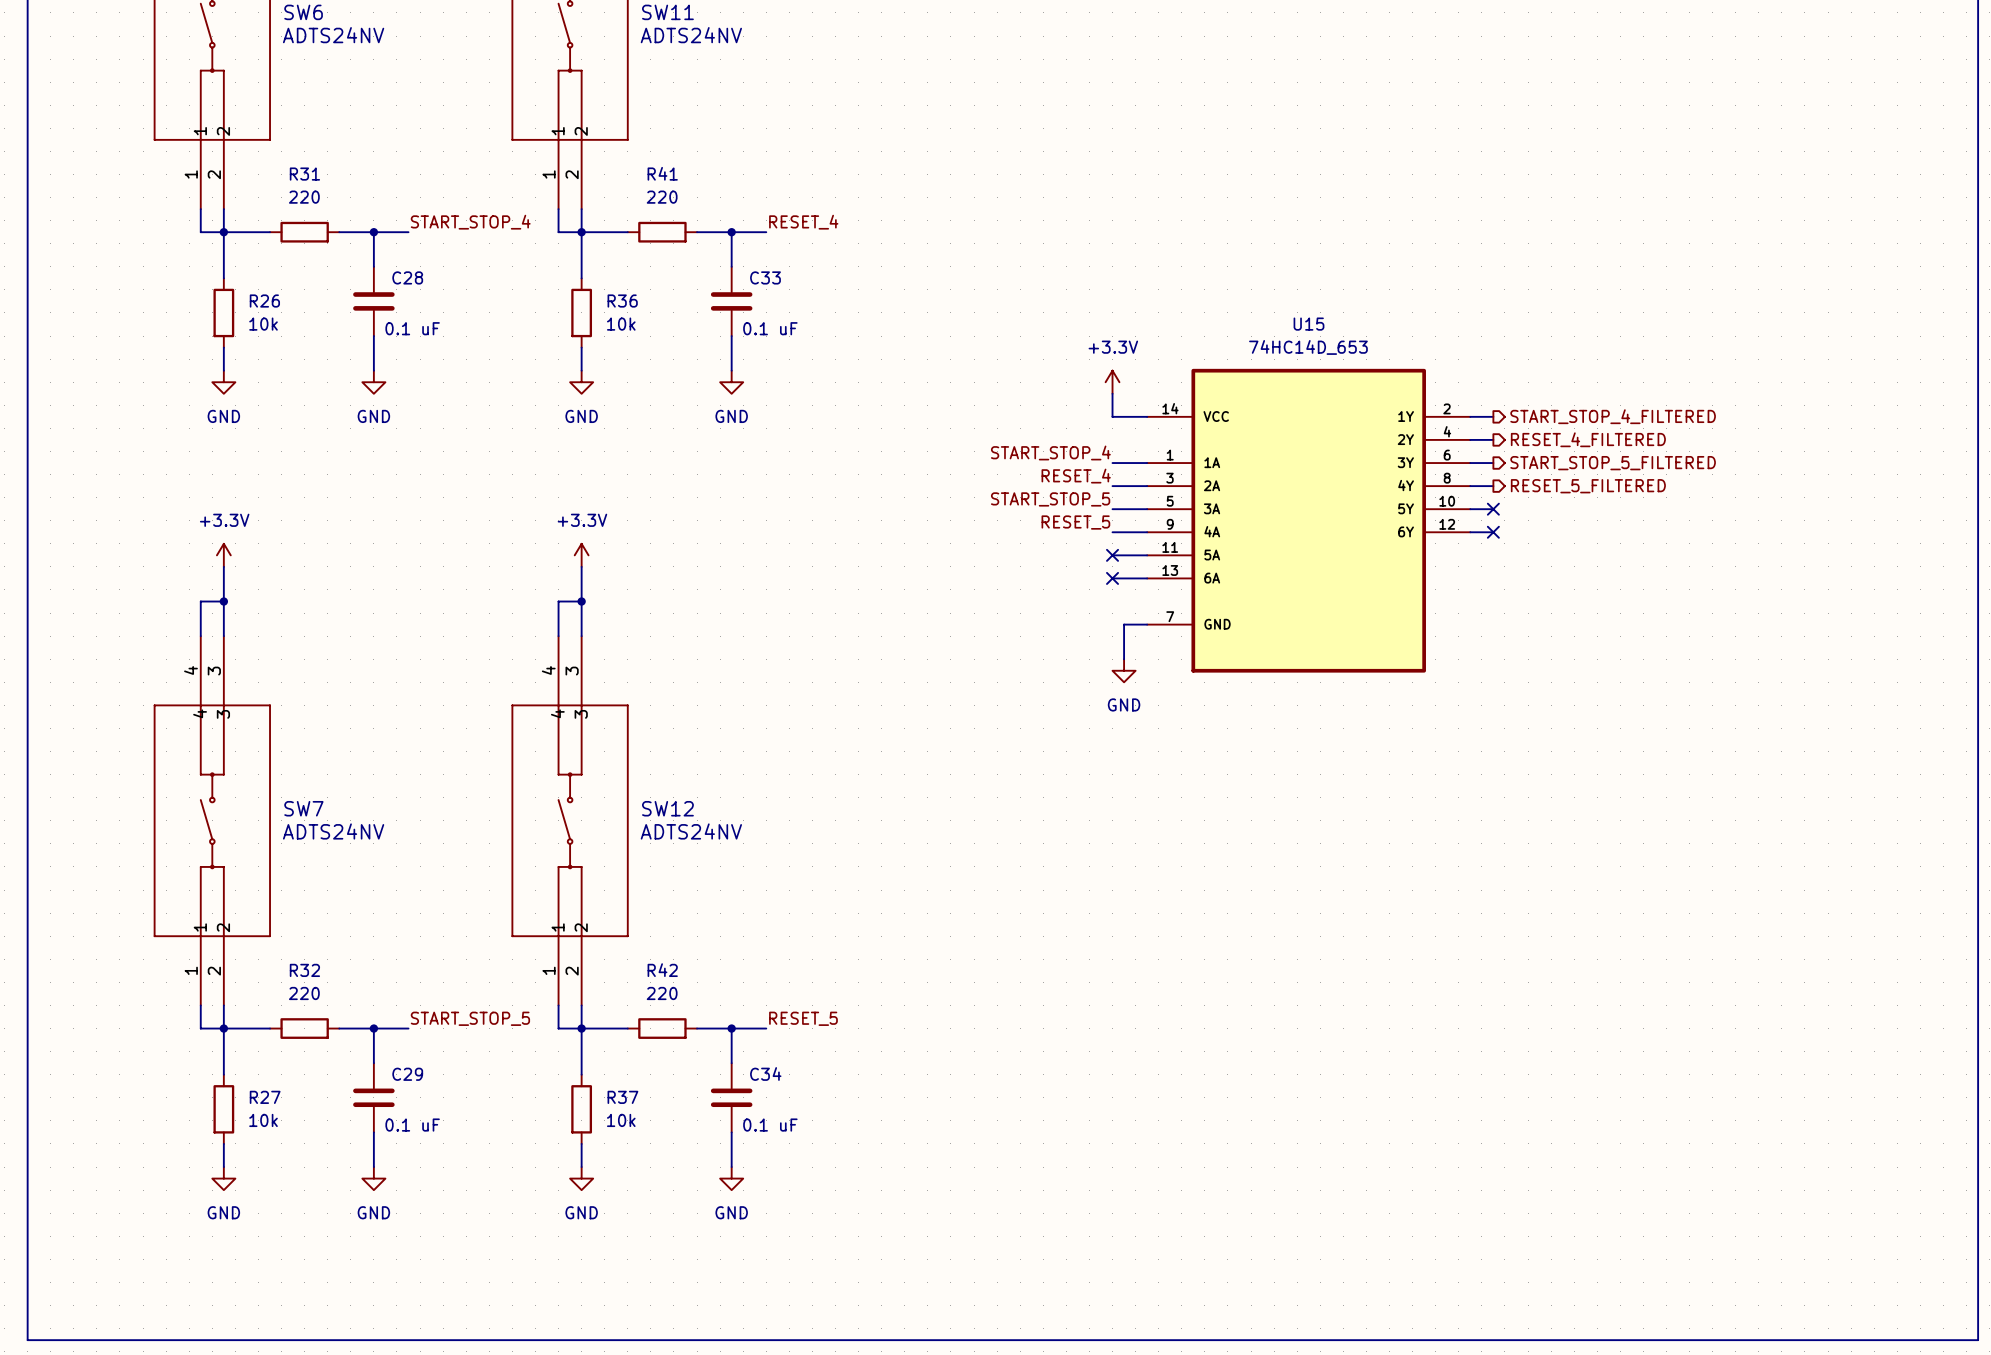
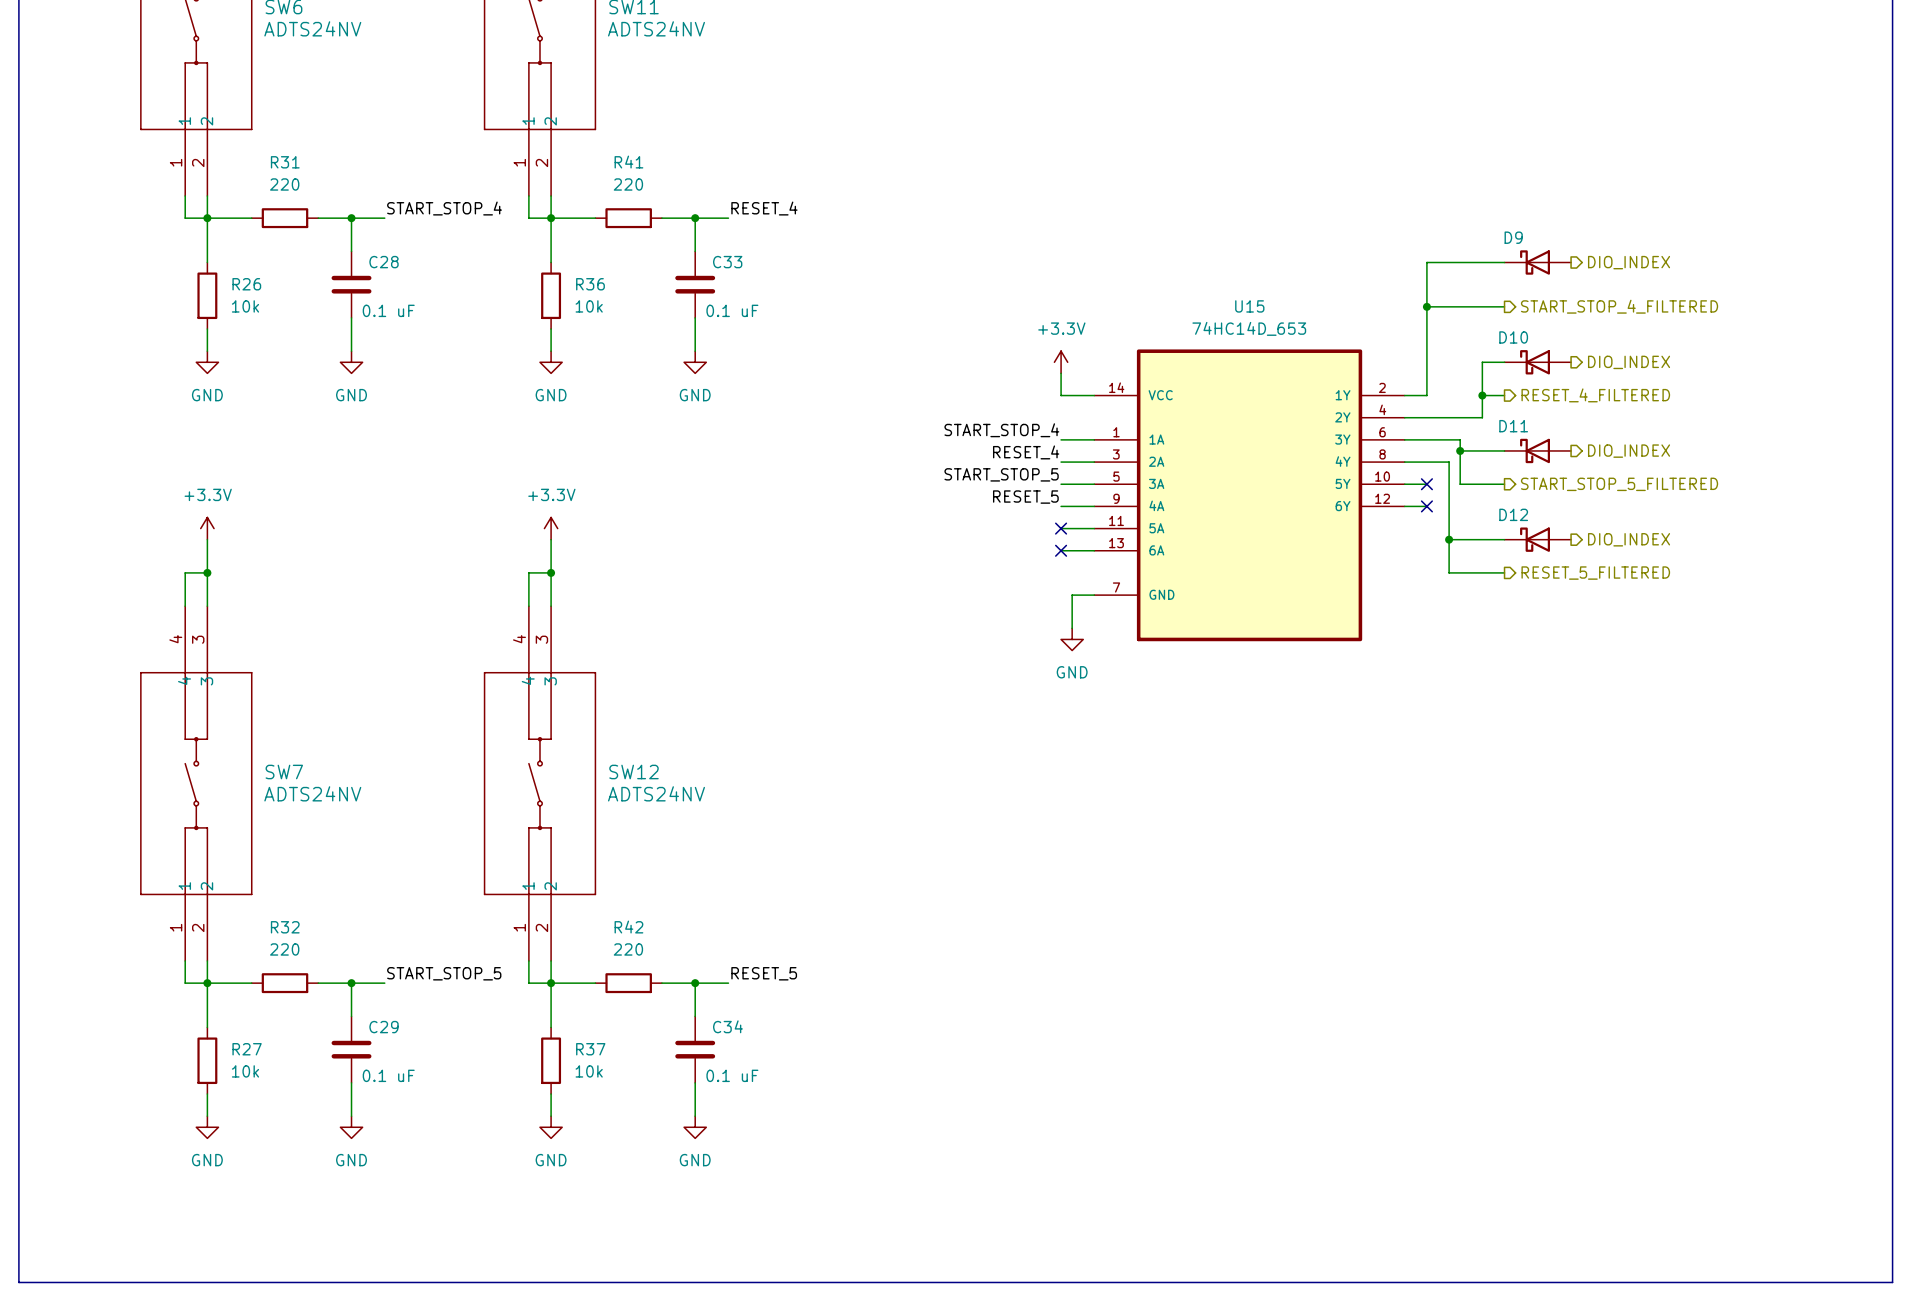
wire: none -> (1504, 262) (1426, 262) (1426, 395)
D9: none -> (1537, 262)
hierarchical label: none -> DIO_INDEX (1629, 262)
wire: none -> (1426, 306) (1504, 306)
junction: none -> (1426, 306)
wire: none -> (1504, 362) (1482, 362) (1482, 417) (1426, 417)
D10: none -> (1537, 362)
hierarchical label: none -> DIO_INDEX (1629, 362)
wire: none -> (1482, 395) (1504, 395)
junction: none -> (1482, 395)
hierarchical label position: START_STOP_4_FILTERED (1613, 416) -> START_STOP_4_FILTERED (1619, 306)
hierarchical label position: RESET_4_FILTERED (1588, 439) -> RESET_4_FILTERED (1595, 395)
wire: none -> (1426, 439) (1460, 439) (1460, 484) (1504, 484)
hierarchical label position: START_STOP_5_FILTERED (1613, 463) -> START_STOP_5_FILTERED (1619, 484)
wire: none -> (1460, 450) (1504, 450)
junction: none -> (1460, 450)
D11: none -> (1537, 450)
hierarchical label: none -> DIO_INDEX (1629, 451)
wire: none -> (1426, 462) (1449, 462) (1449, 572) (1504, 572)
hierarchical label position: RESET_5_FILTERED (1588, 486) -> RESET_5_FILTERED (1595, 573)
wire: none -> (1449, 539) (1504, 539)
junction: none -> (1449, 539)
D12: none -> (1537, 539)
hierarchical label: none -> DIO_INDEX (1629, 539)

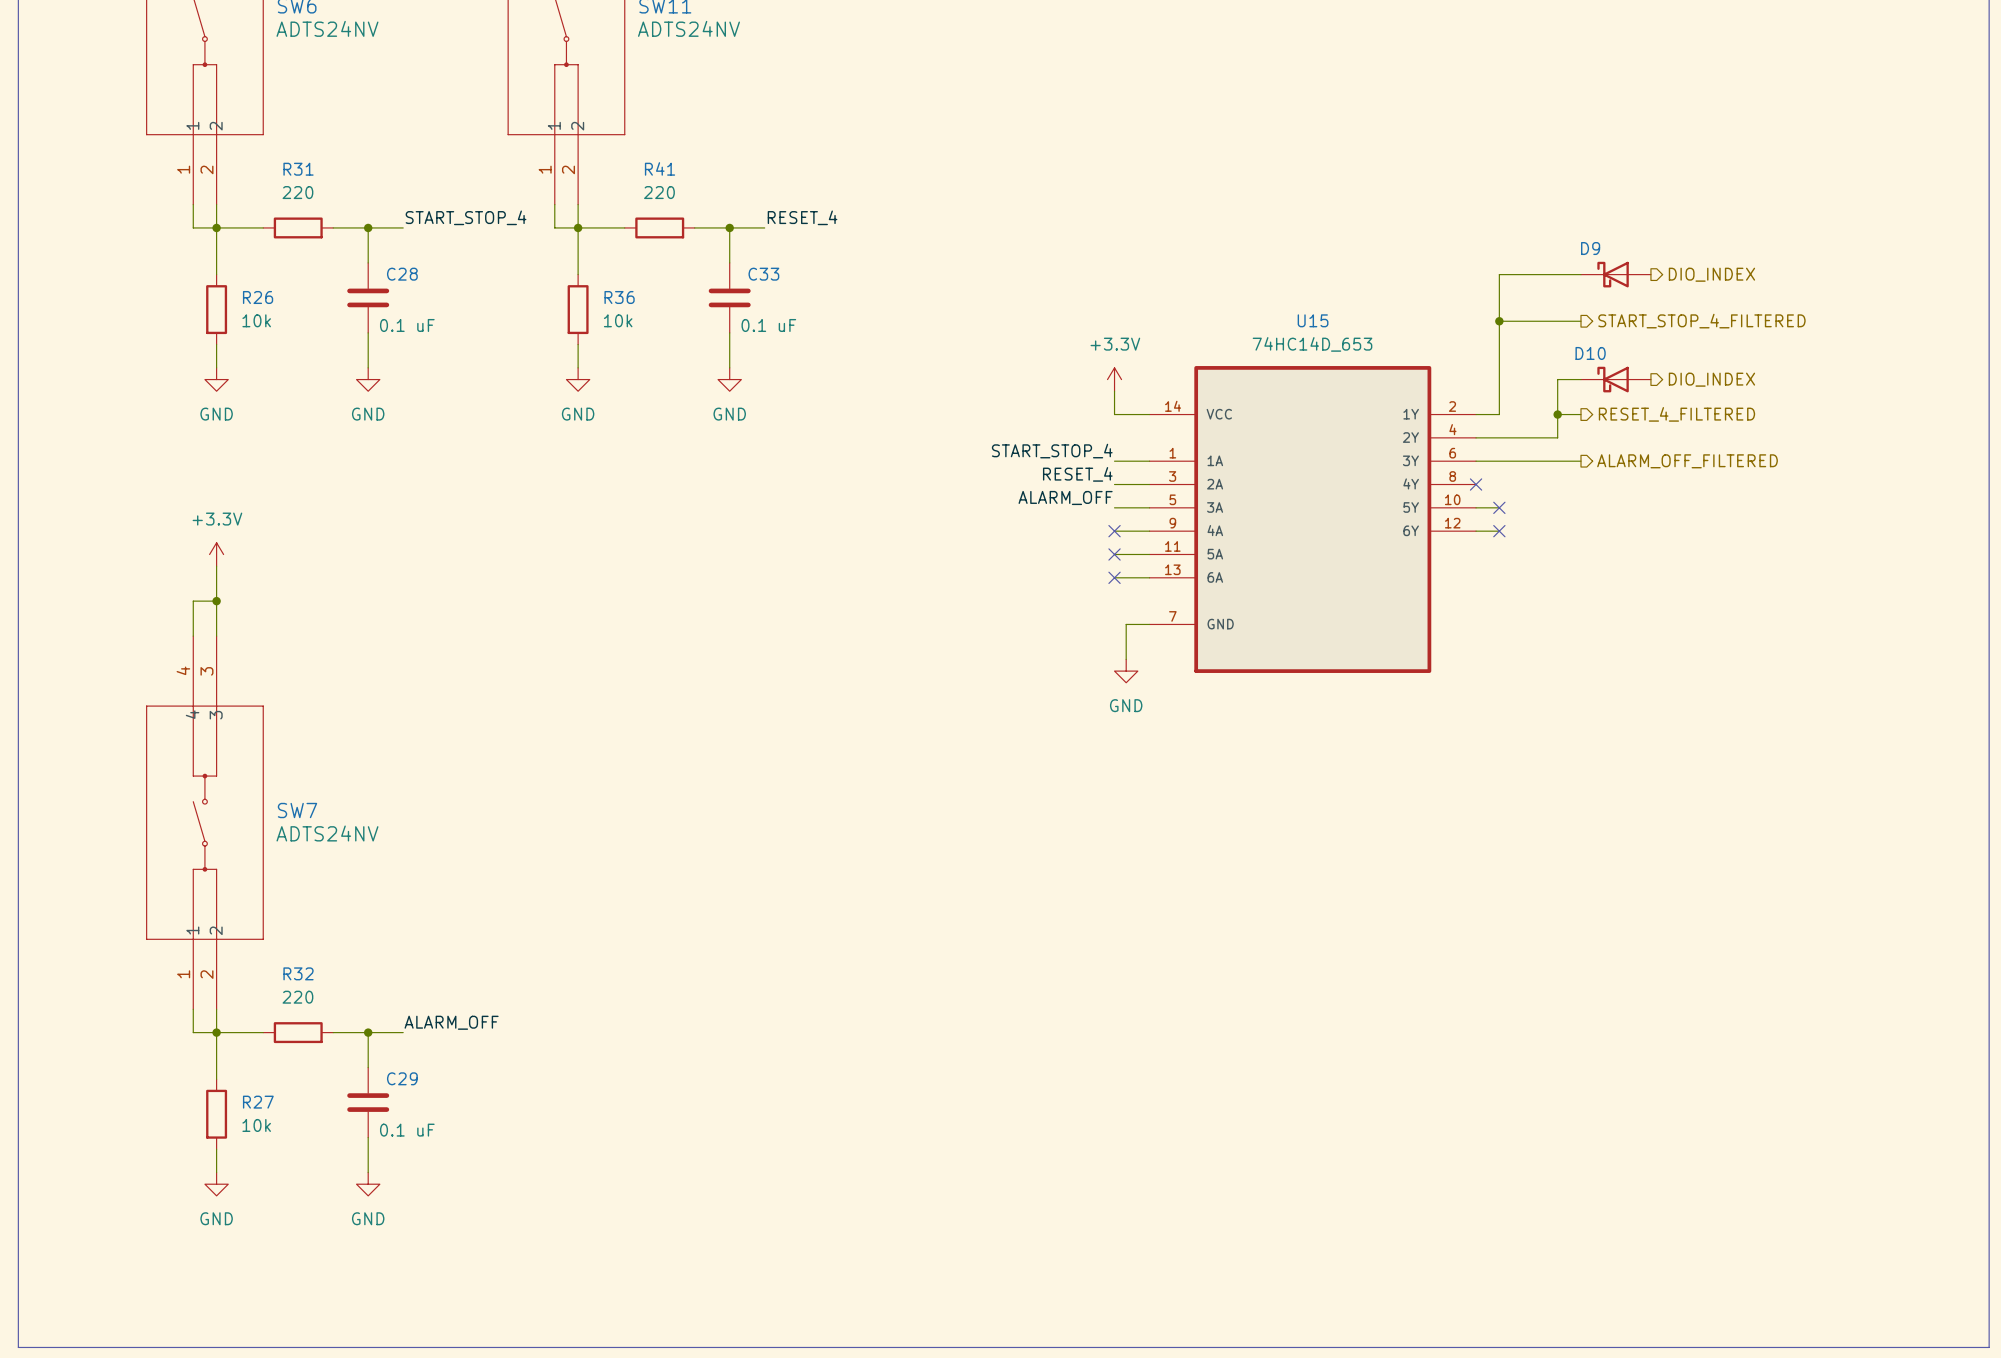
wire: (1460, 439) (1460, 484) (1504, 484) -> (1534, 461) (1580, 461)
hierarchical label: none -> ALARM_OFF_FILTERED (1687, 461)
wire: (1460, 450) (1504, 450) -> none
junction: (1460, 450) -> none
D11: (1537, 450) -> none
hierarchical label: DIO_INDEX (1629, 451) -> none
wire: (1404, 462) (1449, 462) (1449, 572) (1504, 572) -> none
no-connect mark: none -> (1476, 484)
label: START_STOP_5 (1001, 474) -> ALARM_OFF (1065, 497)
hierarchical label: START_STOP_5_FILTERED (1619, 484) -> none
label: RESET_5 (1025, 497) -> none
no-connect mark: none -> (1114, 531)
power symbol: +3.3V (551, 528) -> none
wire: (551, 539) (551, 606) -> none
wire: (1449, 539) (1504, 539) -> none
junction: (1449, 539) -> none
D12: (1537, 539) -> none
hierarchical label: DIO_INDEX (1629, 539) -> none
wire: (551, 572) (528, 572) (528, 606) -> none
junction: (551, 572) -> none
hierarchical label: RESET_5_FILTERED (1595, 573) -> none
SW12: ADTS24NV (539, 783) -> none
wire: (528, 960) (528, 983) (595, 983) -> none
wire: (551, 960) (551, 1027) -> none
label: START_STOP_5 (444, 973) -> ALARM_OFF (451, 1022)
label: RESET_5 (764, 973) -> none
junction: (551, 983) -> none
R42: 220 (628, 983) -> none
wire: (661, 983) (728, 983) -> none
wire: (695, 983) (695, 1016) -> none
junction: (695, 983) -> none
C34: 0.1 uF (695, 1049) -> none
R37: 10k (551, 1060) -> none
wire: (695, 1082) (695, 1116) -> none
wire: (551, 1094) (551, 1116) -> none
power symbol: GND (551, 1127) -> none
power symbol: GND (695, 1127) -> none

